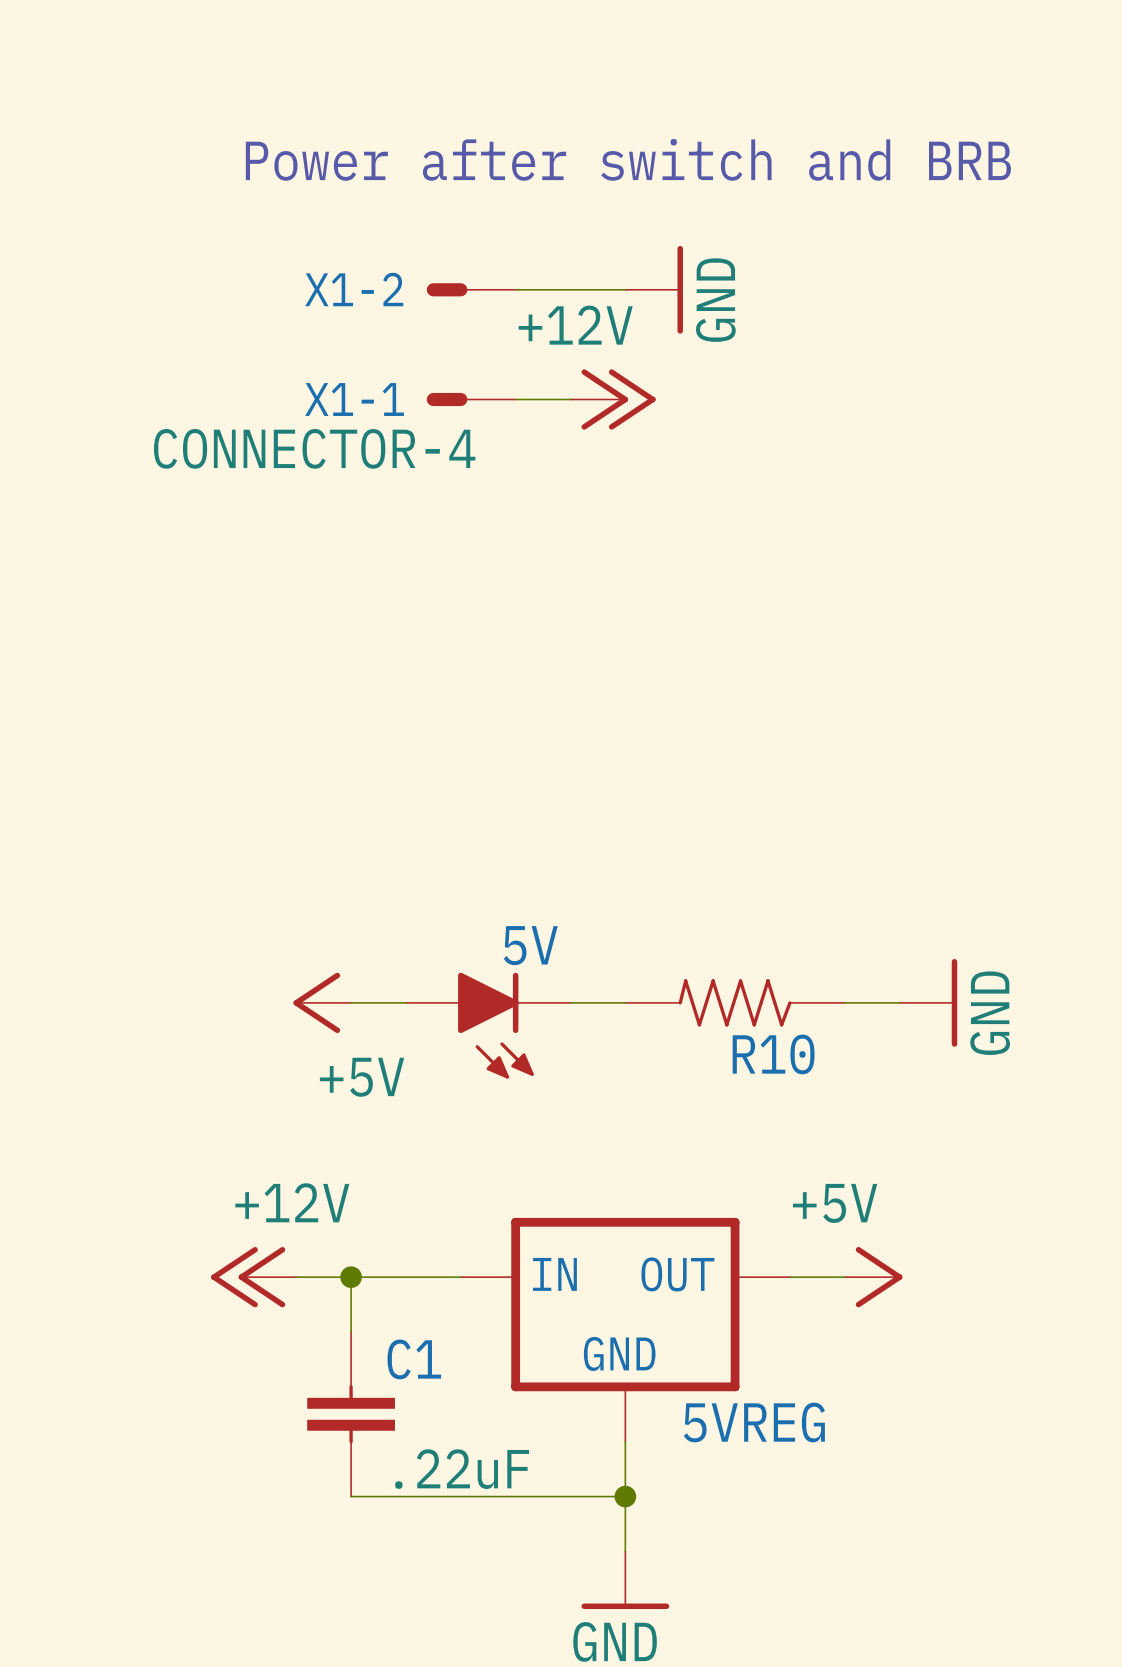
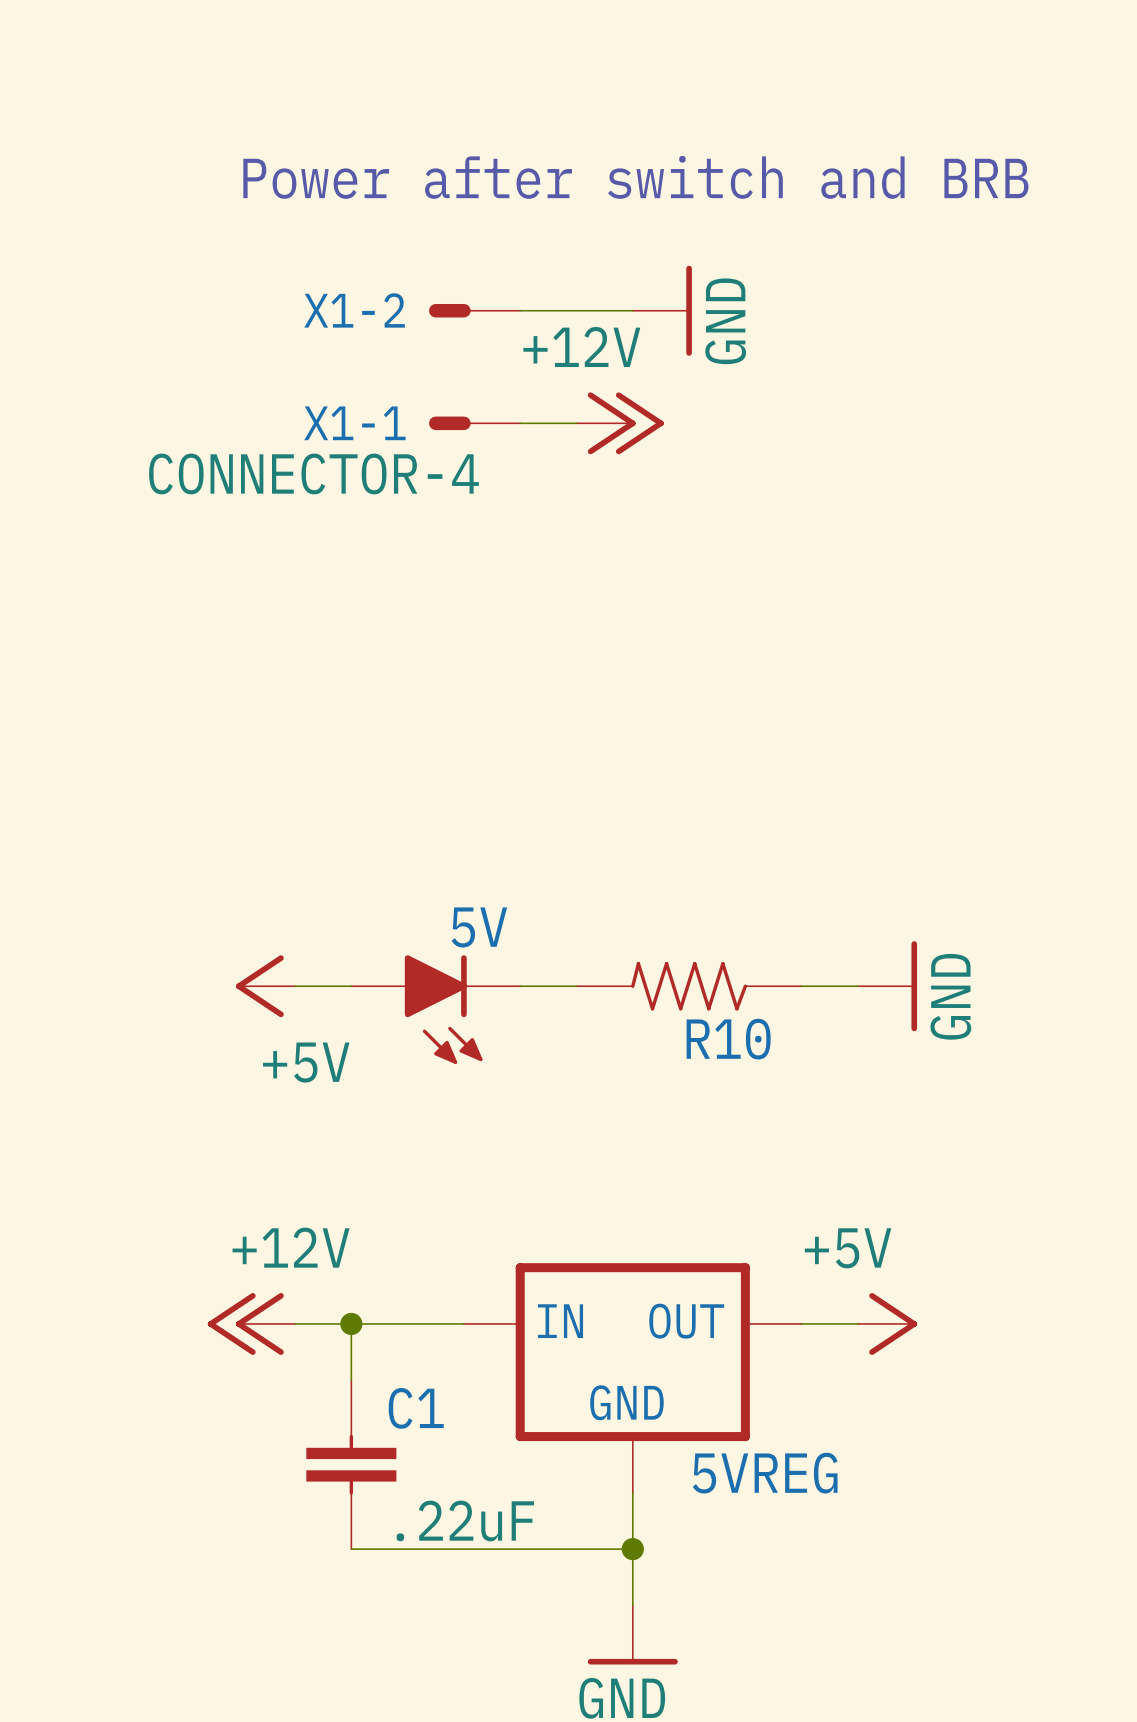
power symbol position: +5V (322, 1002) -> +5V (265, 986)
wire: (351, 1002) (405, 1002) -> (295, 986) (351, 986)
wire: (570, 1002) (625, 1002) -> (520, 986) (576, 986)
R10 position: (735, 1002) -> (689, 986)
wire: (844, 1002) (899, 1002) -> (801, 986) (857, 986)
power symbol position: GND (928, 1002) -> GND (887, 986)
5V position: (488, 1025) -> (435, 1009)

